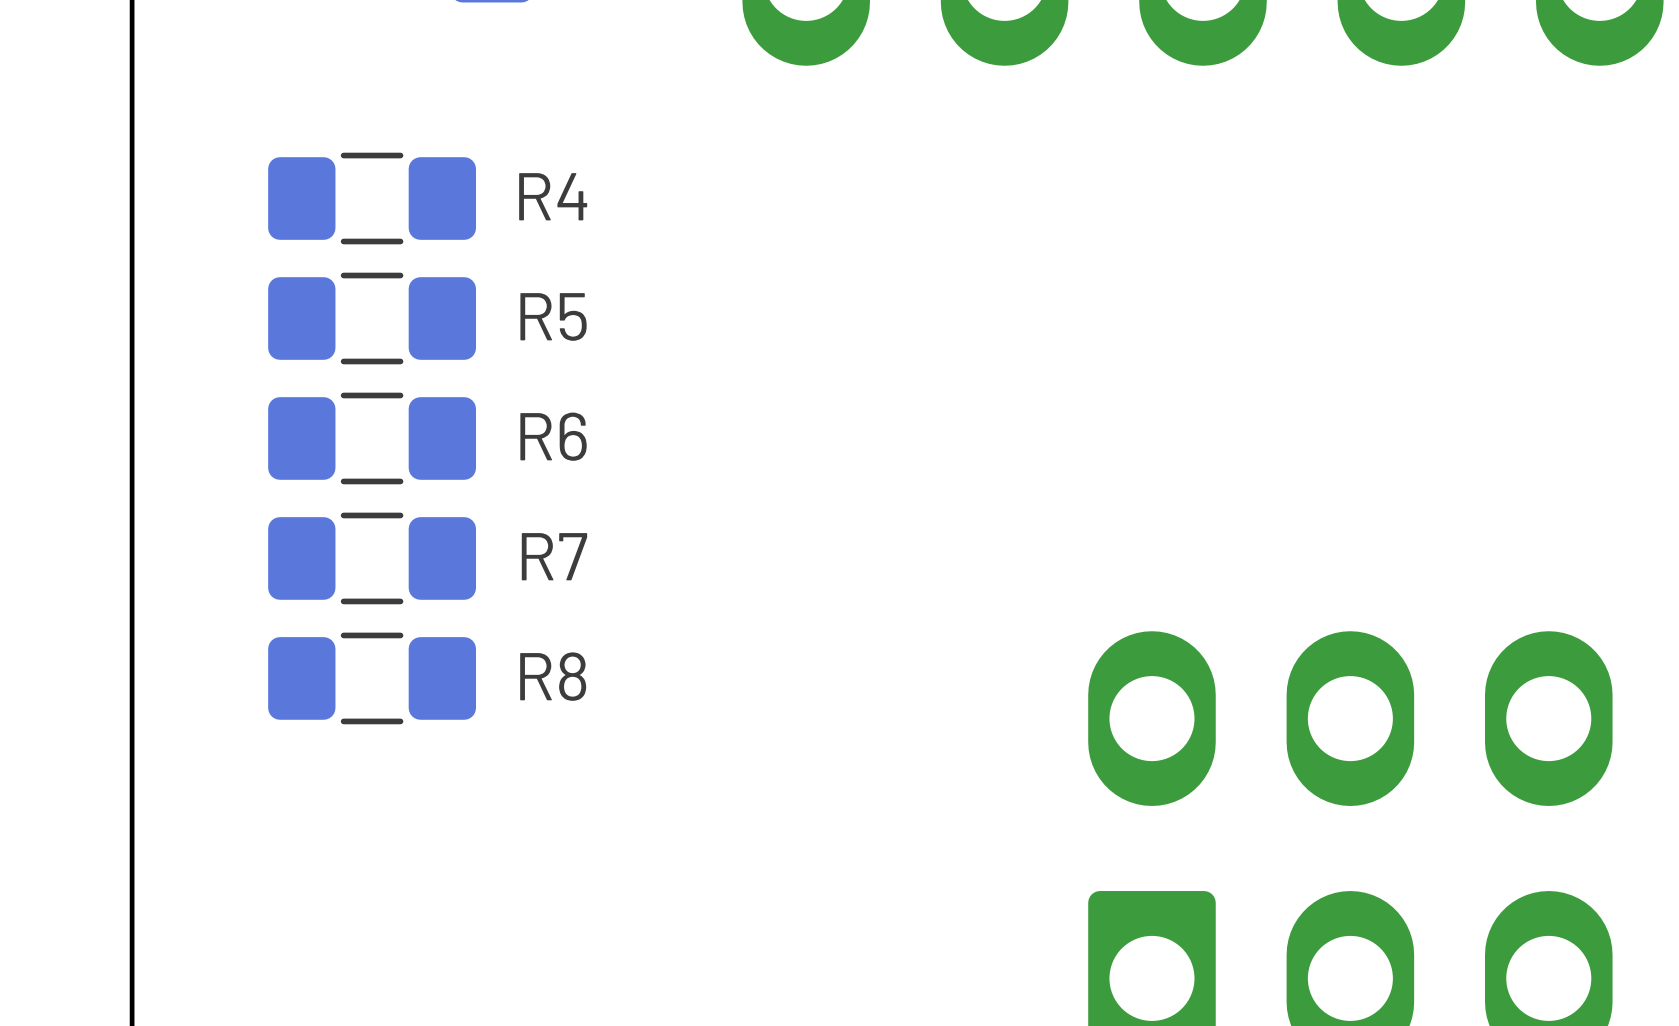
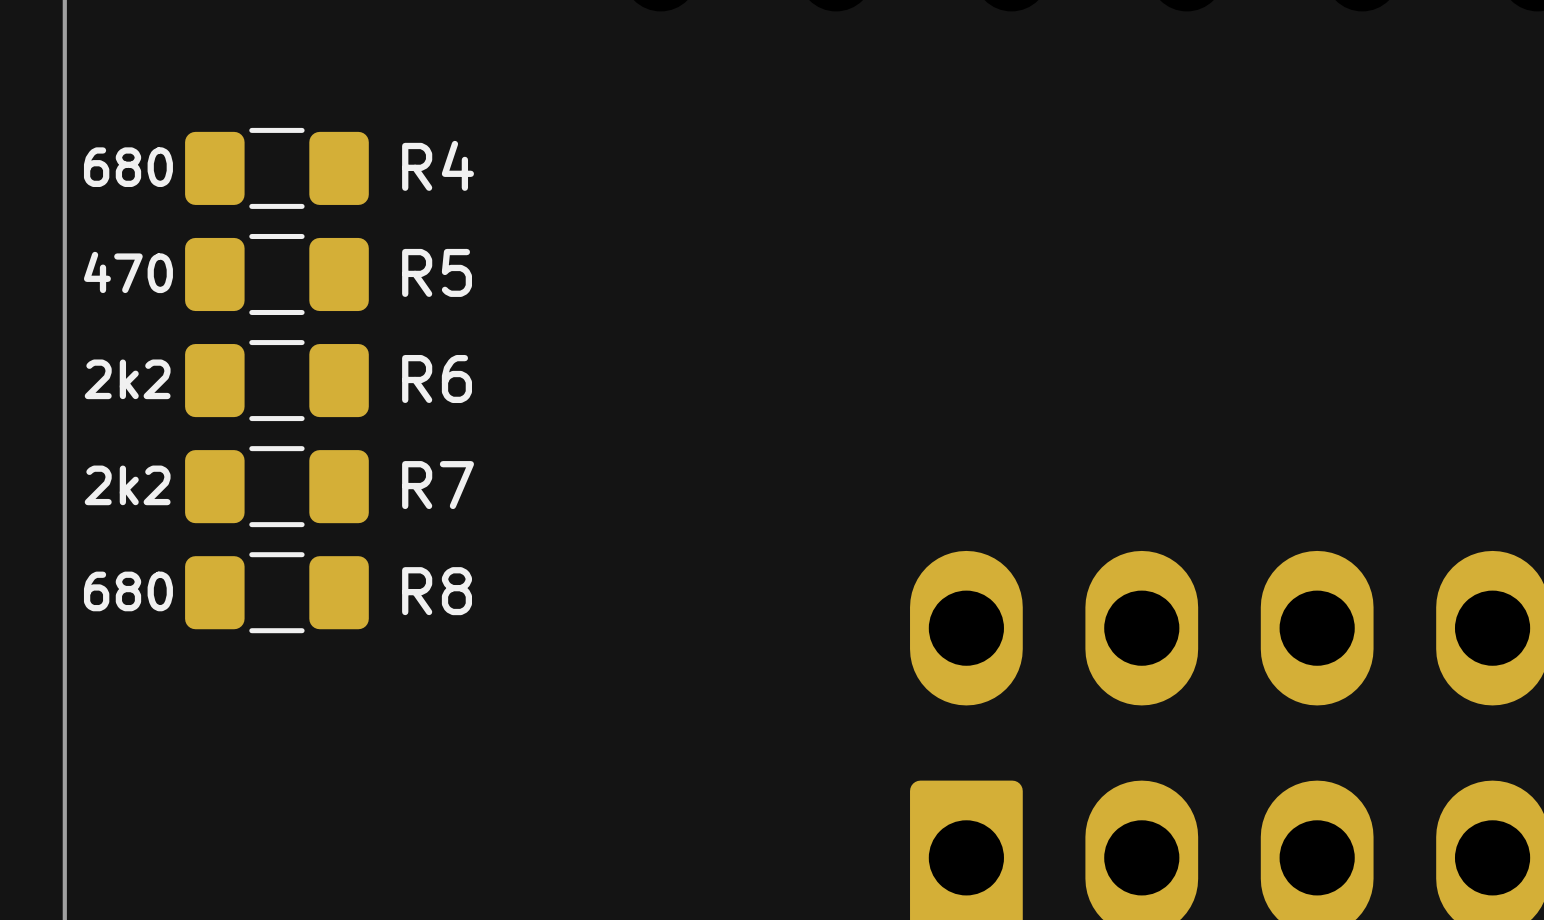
R4 value: none -> 680 (128, 167)
R5 value: none -> 470 (128, 272)
R6 value: none -> 2k2 (127, 379)
R7 value: none -> 2k2 (127, 485)
R8 value: none -> 680 (128, 591)

